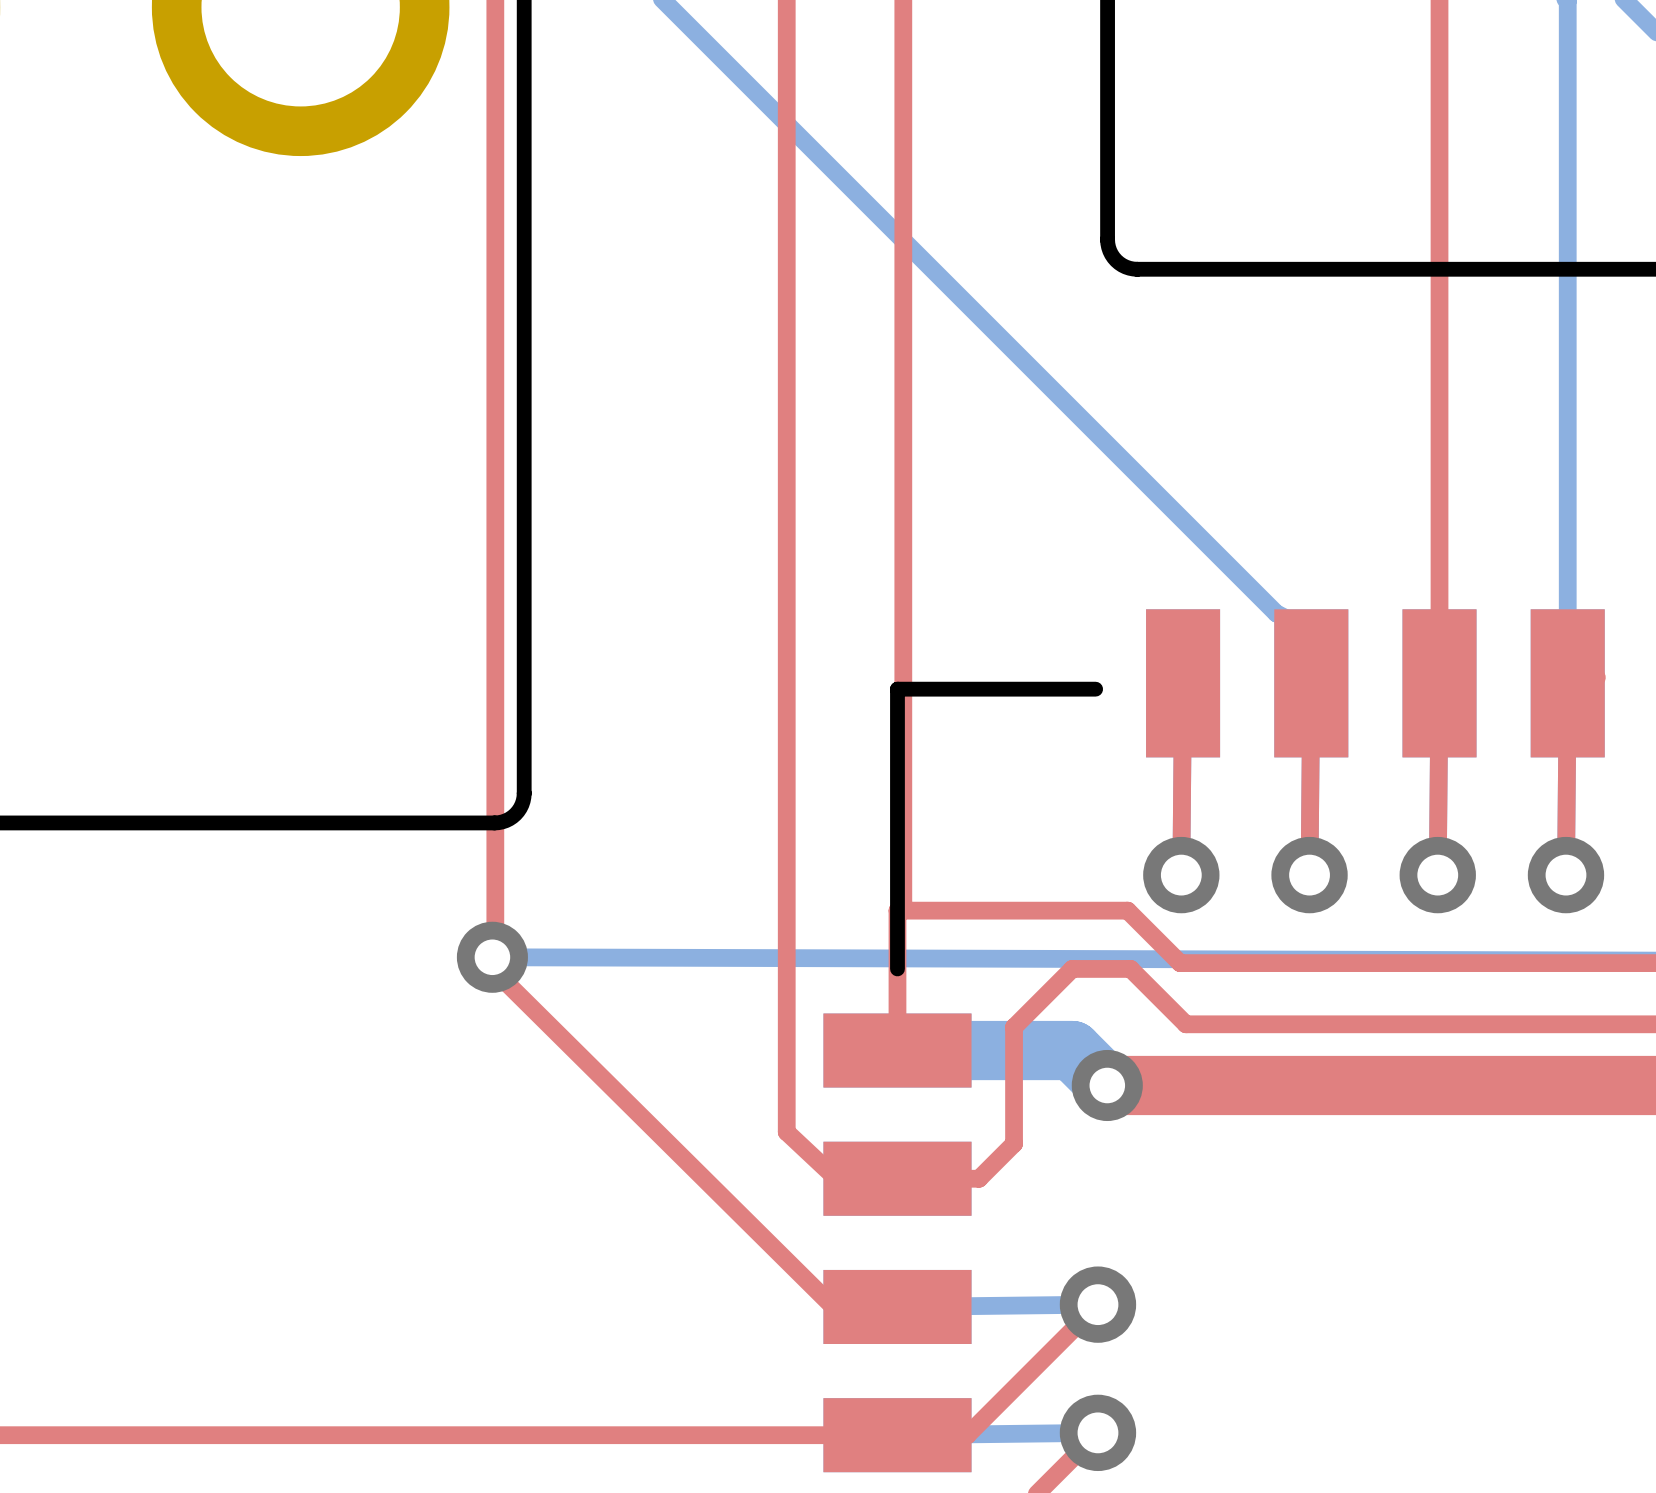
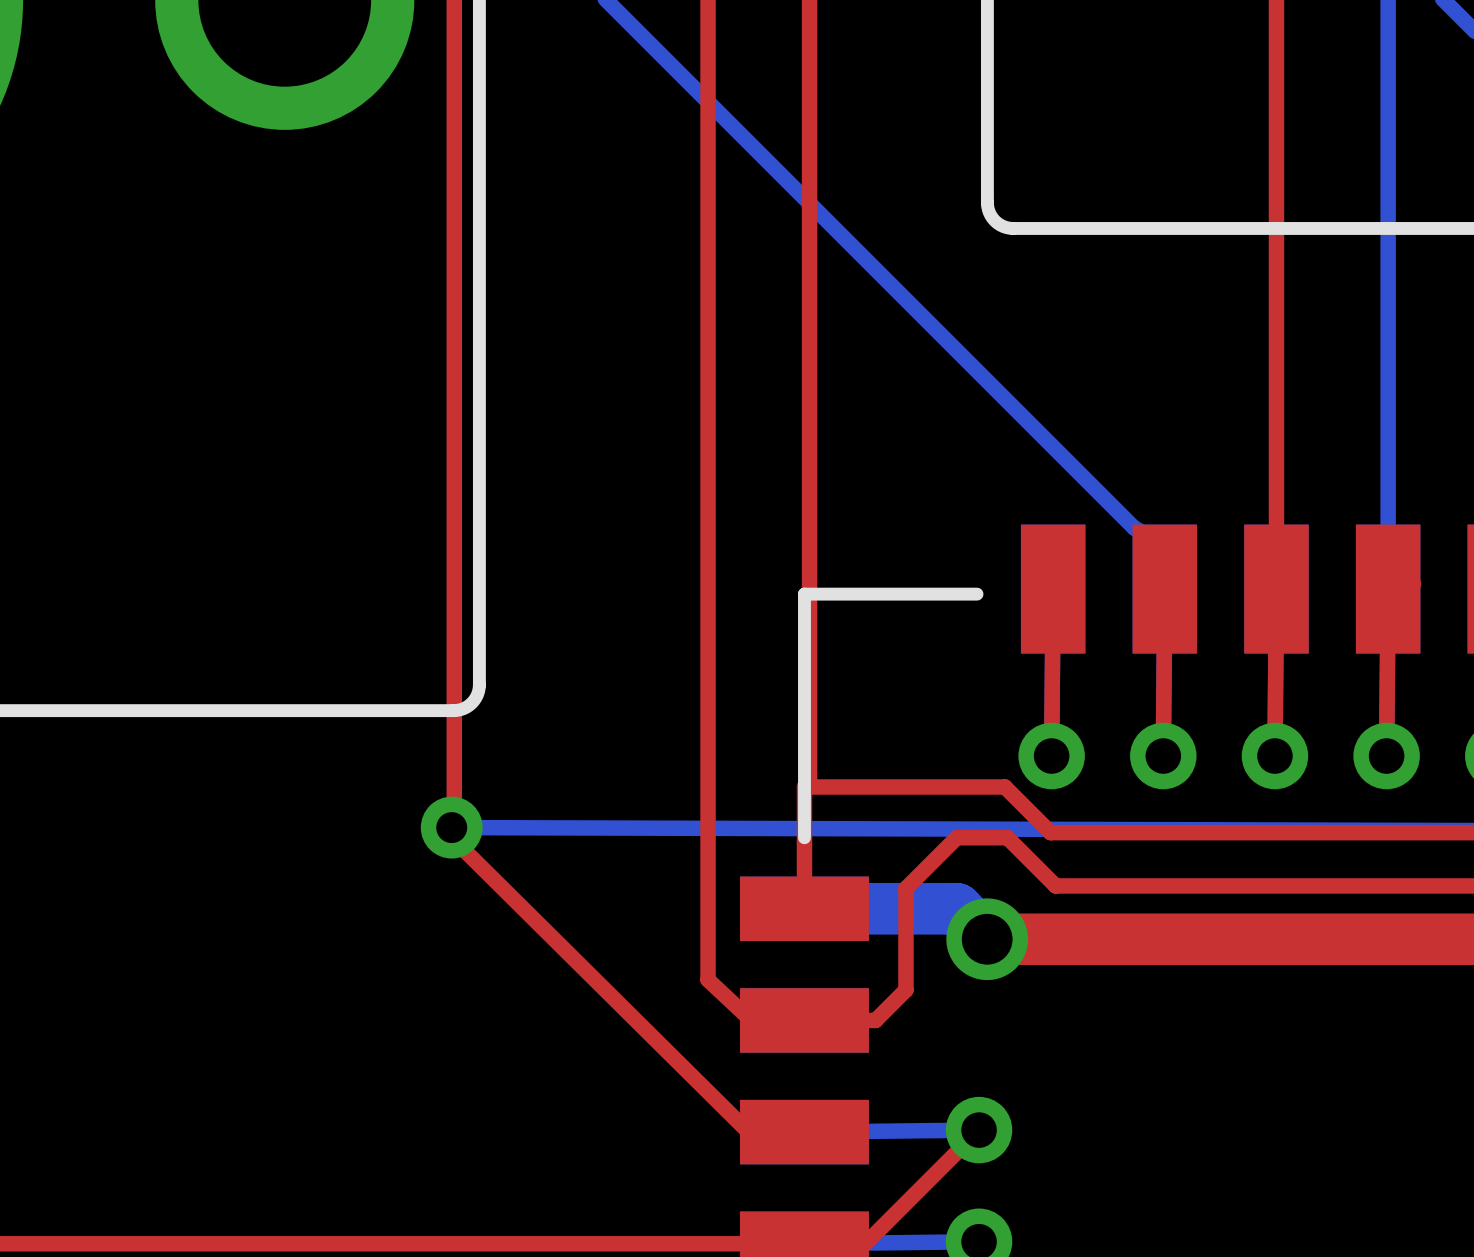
via size: [1071, 1049, 1143, 1122] -> [946, 898, 1029, 981]

